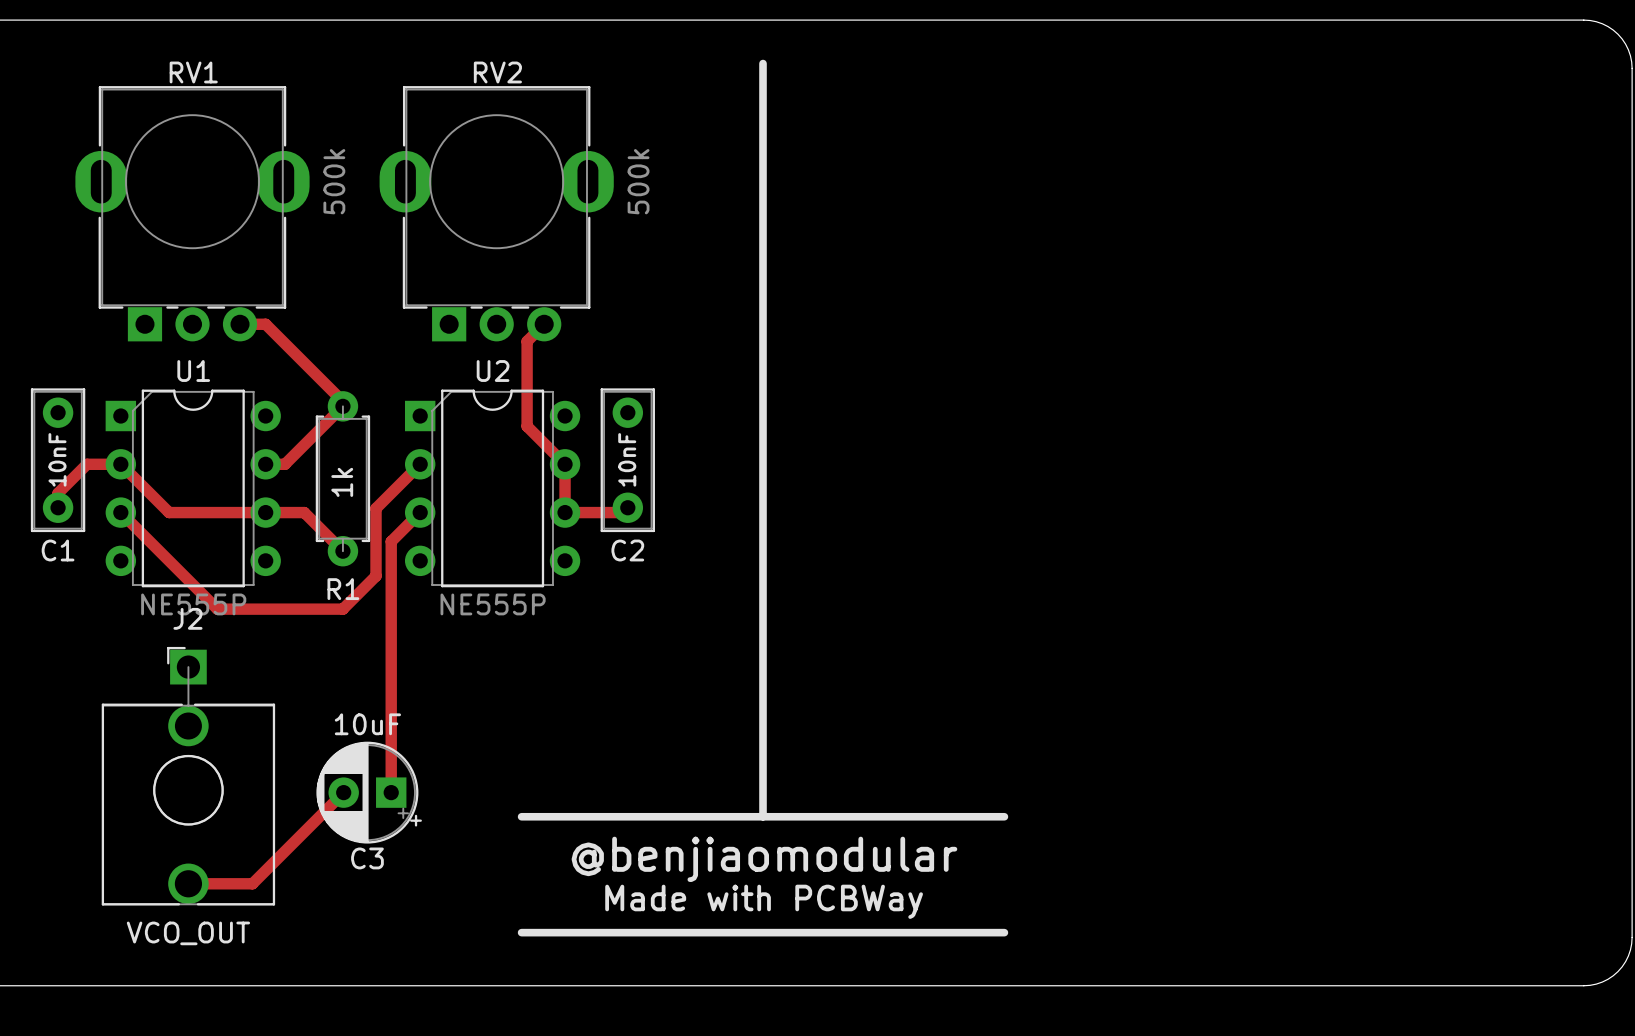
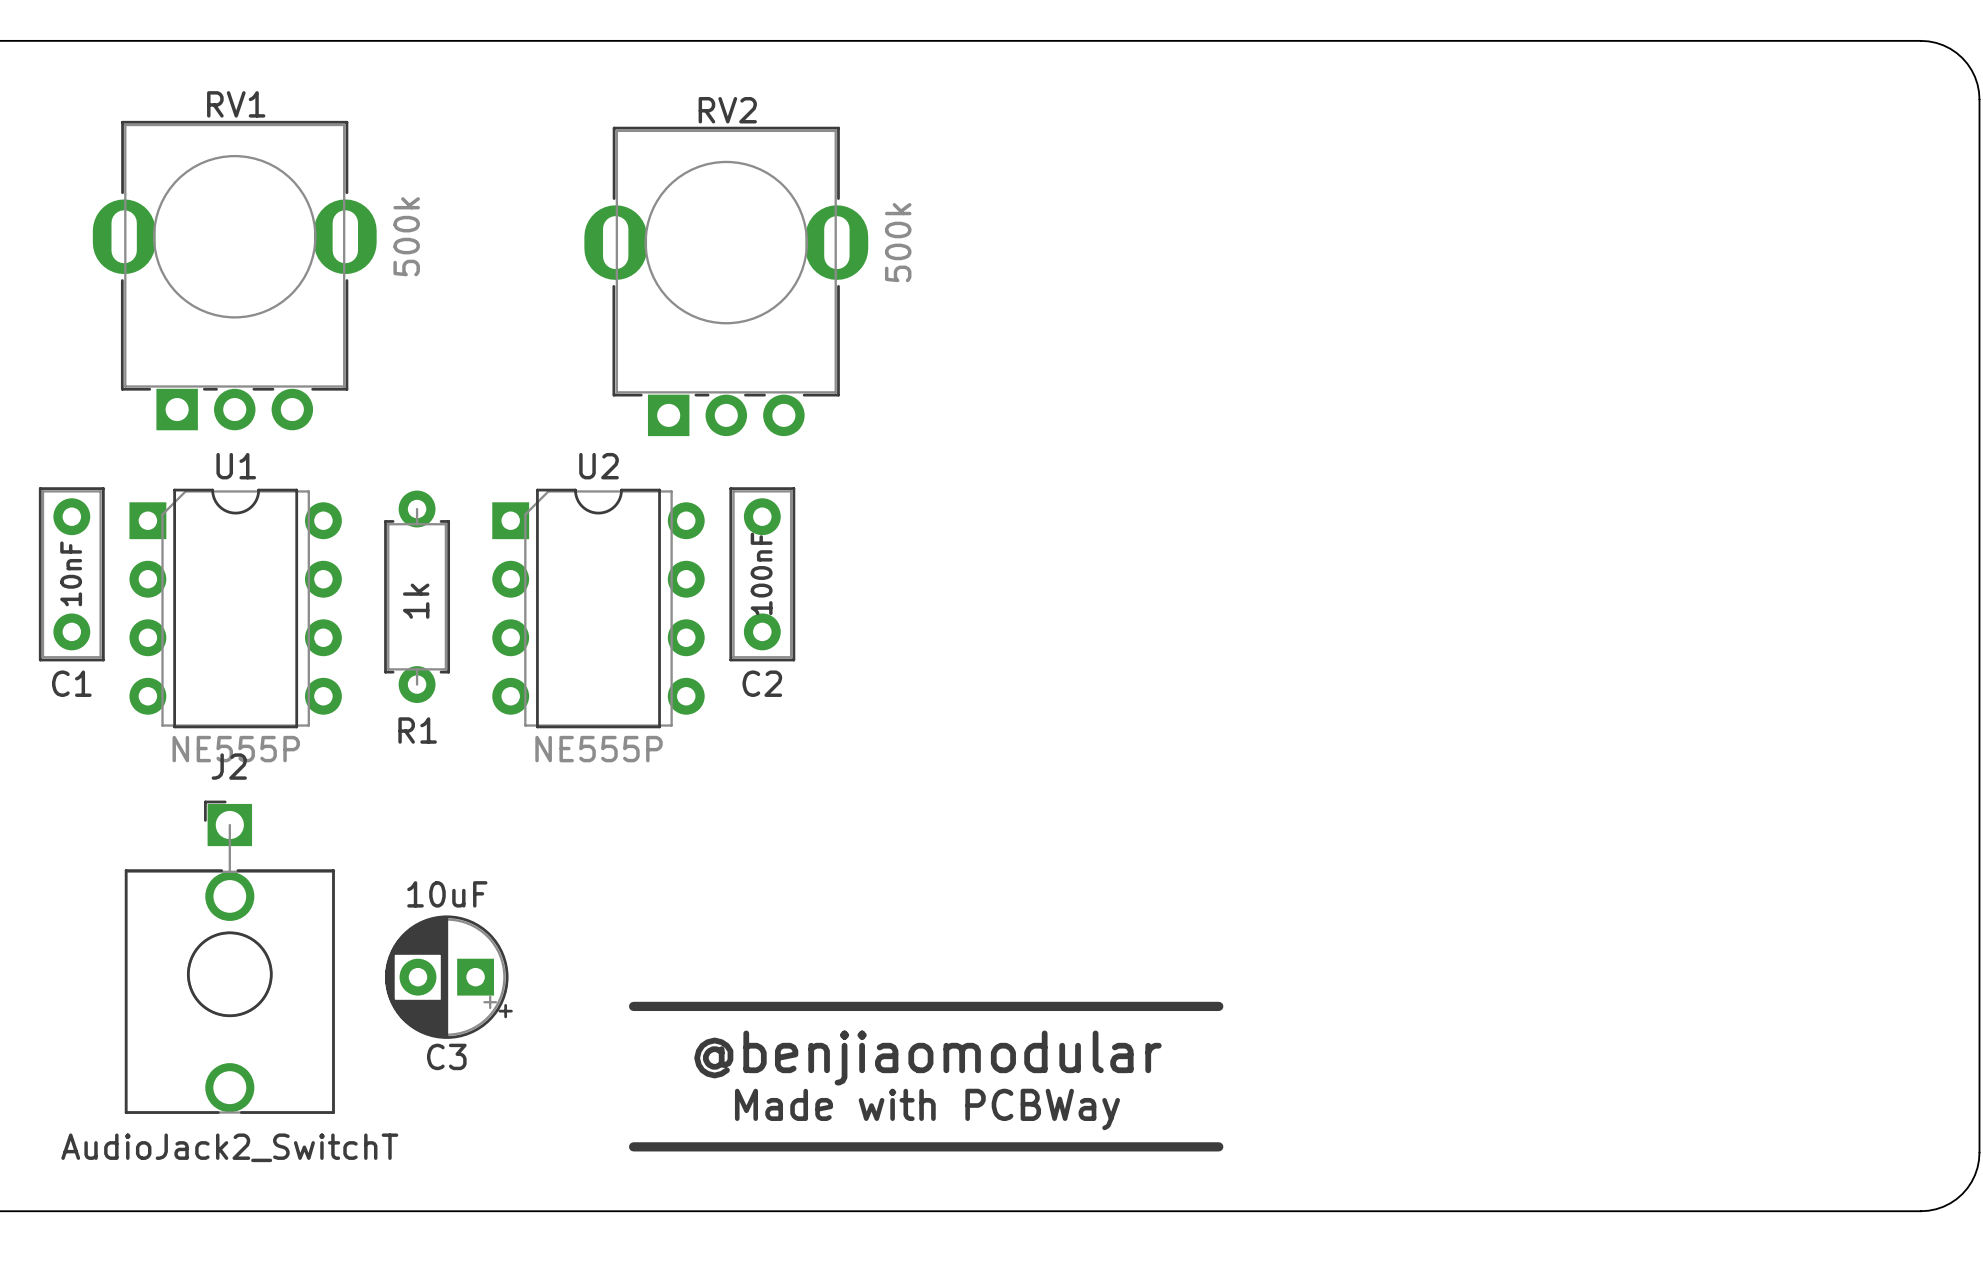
line: (763, 63) (763, 816) -> none
RV2 position: (496, 213) -> (726, 281)
track: (240, 324) (265, 324) (342, 401) (342, 406) (285, 464) (265, 464) -> none
track: (544, 324) (527, 341) (527, 426) (565, 464) (565, 512) (622, 512) (627, 507) -> none
C2 value: 10nF (627, 459) -> 100nF (761, 573)
track: (420, 464) (376, 508) (376, 576) (342, 609) (217, 609) (120, 512) -> none
track: (58, 507) (58, 493) (87, 464) (120, 464) (169, 512) (304, 512) (342, 551) -> none
track: (420, 512) (391, 541) (391, 792) -> none
track: (343, 792) (252, 883) (188, 883) -> none
J2 value: VCO_OUT (188, 933) -> AudioJack2_SwitchT (229, 1147)

